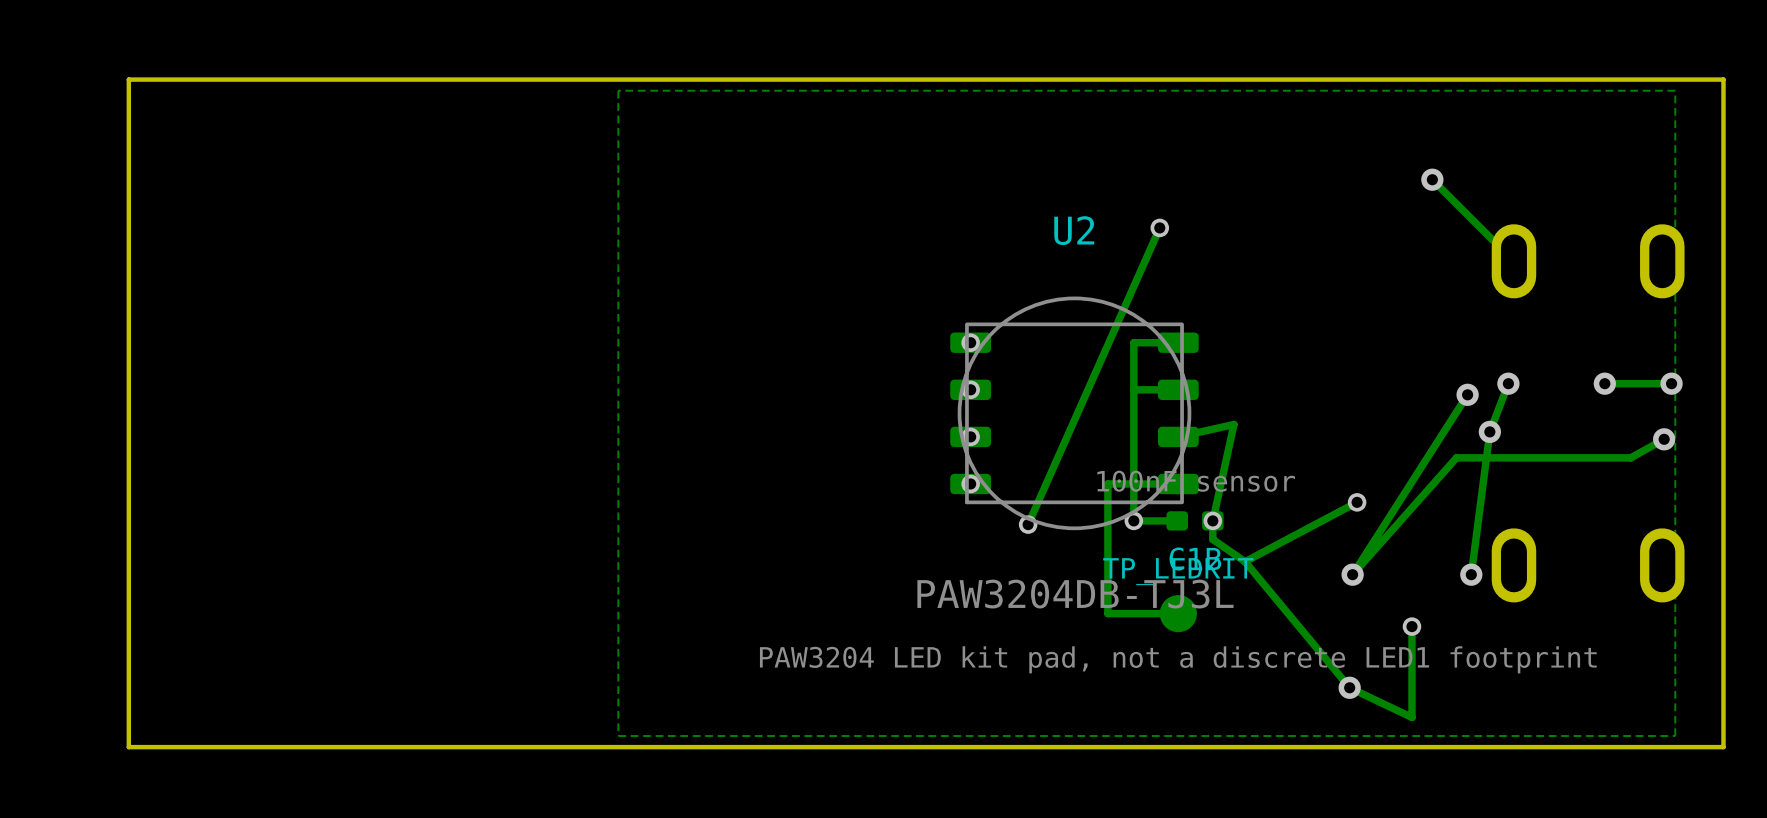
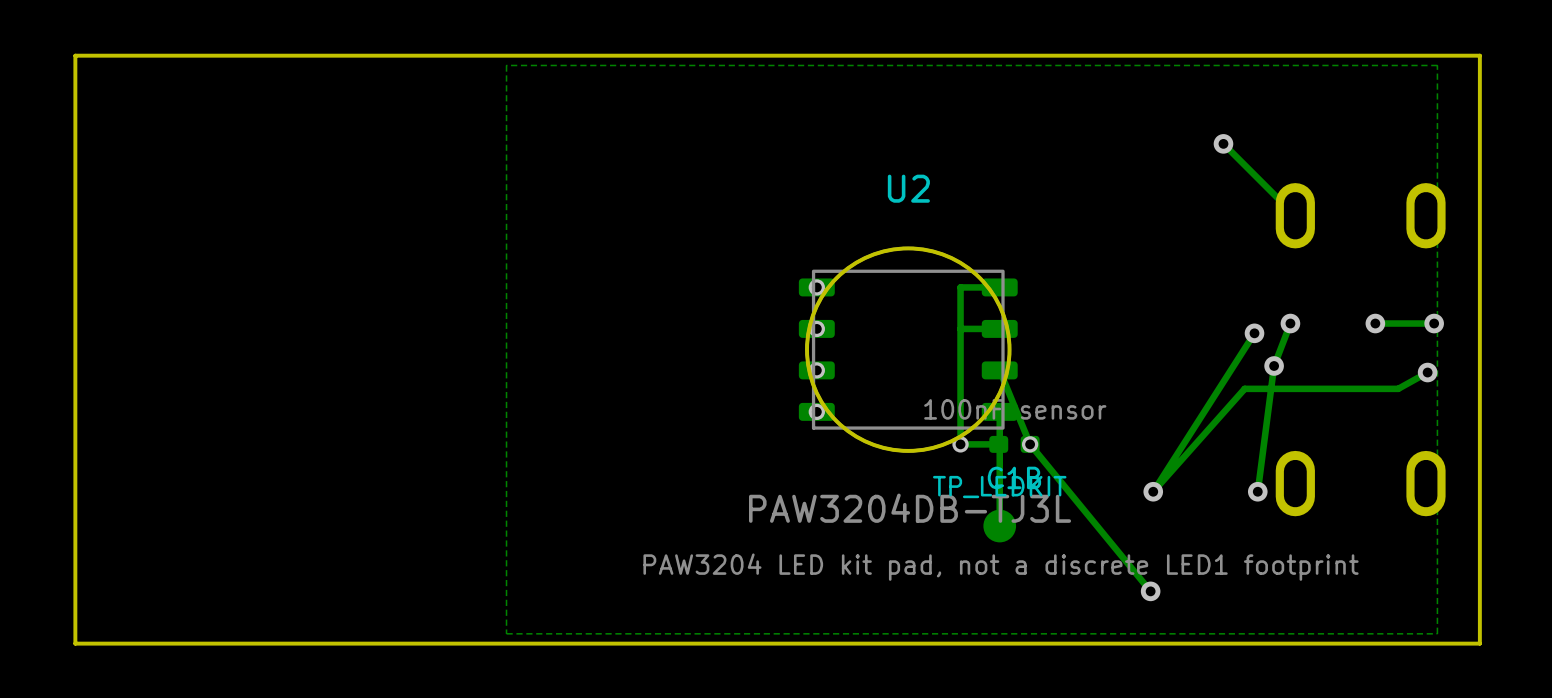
track: (1159, 227) (1028, 524) -> none
via: (1159, 227) -> none
round board edge: none -> [805, 246, 1012, 453]
track: (1178, 436) (1233, 424) (1212, 520) (1212, 539) (1245, 561) -> (999, 370) (1030, 444) (1150, 591)
track: (1178, 484) (1107, 484) (1107, 613) (1178, 613) -> (999, 411) (999, 526)
track: (1357, 502) (1245, 561) -> none
via: (1357, 502) -> none
via: (1028, 524) -> none
track: (1245, 561) (1349, 687) (1411, 717) (1411, 626) -> none
via: (1411, 626) -> none

